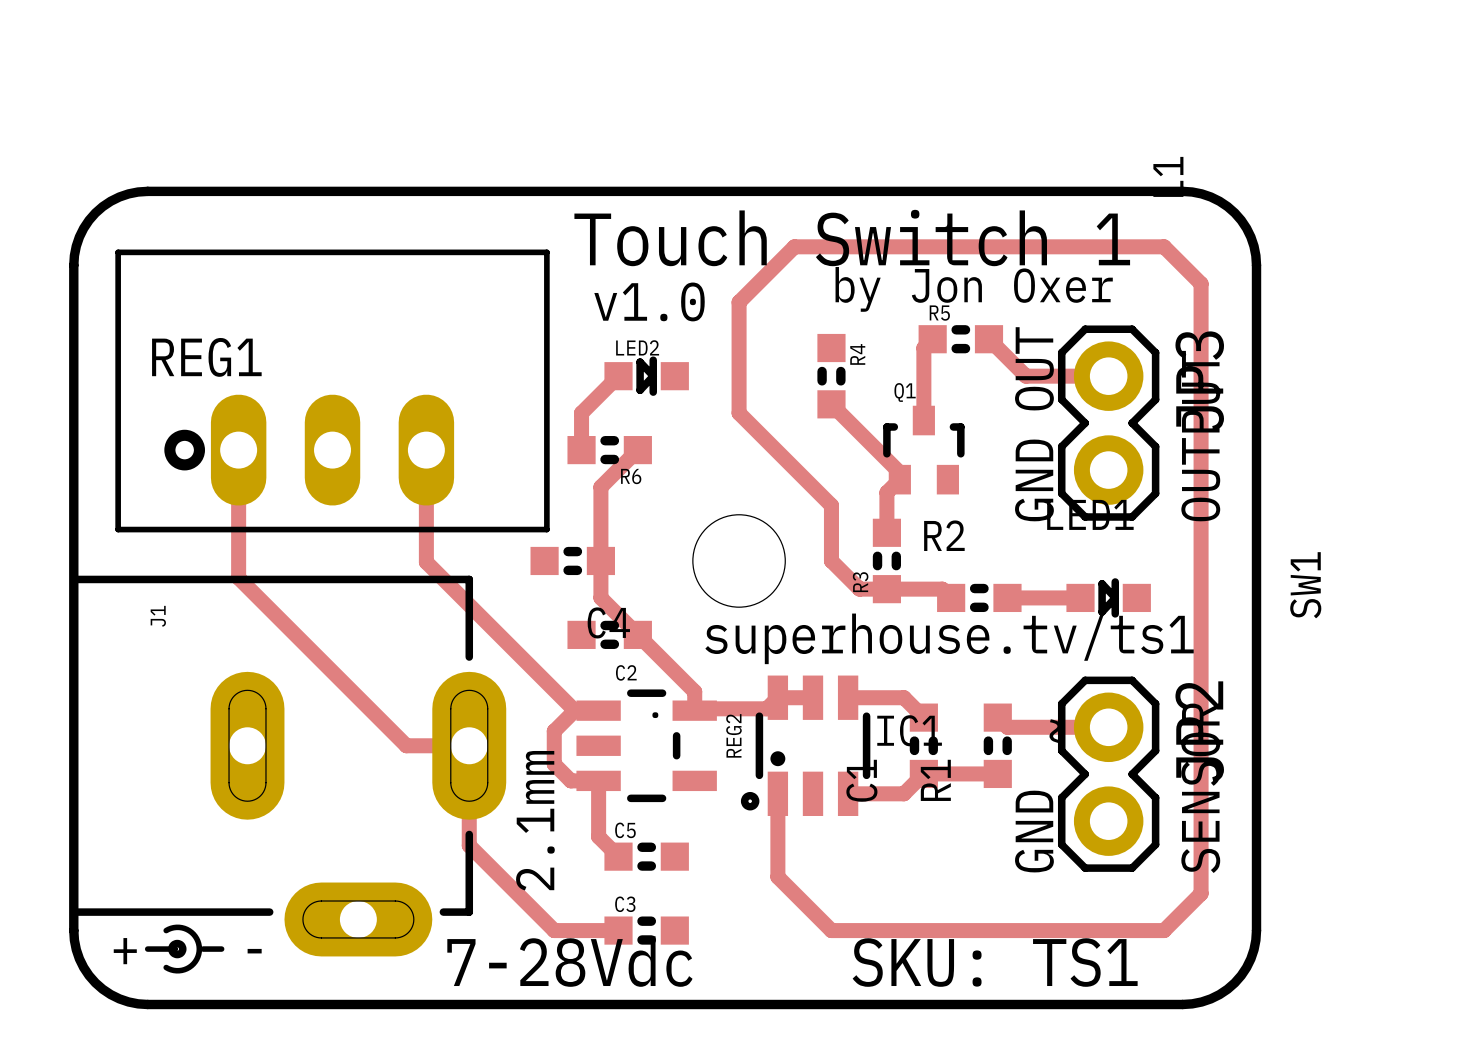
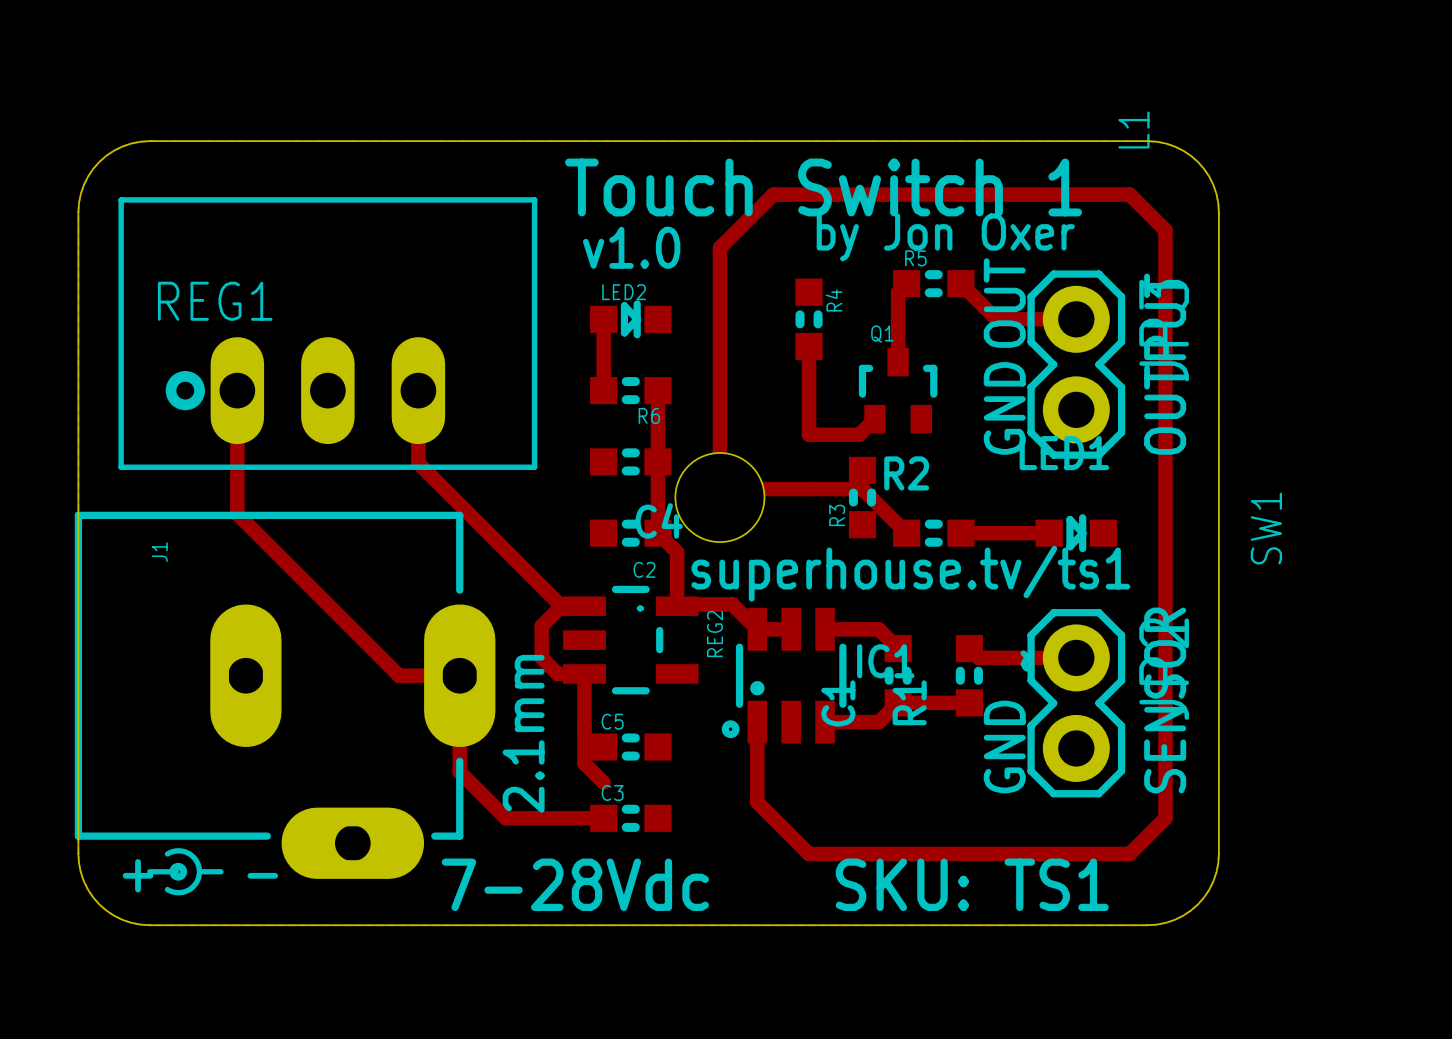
board edge width: thick (147, 191) (1182, 191) (1210, 197) (1227, 206) (1241, 220) (1250, 237) (1256, 265) (1256, 930) (1250, 958) (1241, 975) (1227, 989) (1210, 998) (1182, 1004) (147, 1004) (119, 998) (102, 989) (89, 975) (79, 958) (73, 930) (73, 265) (79, 237) (95, 213) (119, 197) (147, 191) -> thin (149, 141) (1147, 141) (1174, 146) (1191, 155) (1204, 169) (1213, 185) (1218, 212) (1218, 853) (1213, 881) (1204, 897) (1191, 910) (1174, 919) (1147, 925) (149, 925) (122, 919) (106, 910) (93, 897) (83, 881) (78, 853) (78, 212) (83, 185) (99, 162) (122, 146) (149, 141)
top track: (618, 376) (581, 413) (581, 450) -> (603, 319) (603, 390)
top track: (831, 404) (899, 472) (899, 479) -> (809, 346) (809, 434) (859, 434) (862, 431)
top track: (739, 413) (831, 505) (831, 560) (859, 589) (942, 589) (951, 597) -> (719, 354) (719, 461) (747, 489) (863, 489) (906, 533)
R6 position: (609, 450) -> (630, 390)
top track: (637, 450) (600, 487) (600, 597) (694, 691) (694, 710) (696, 708) (766, 708) (777, 697) -> (657, 390) (657, 533) (677, 552) (677, 606) (678, 604) (732, 604) (757, 629)
top track: (886, 492) (886, 532) -> none
top track: (426, 525) (426, 562) (574, 710) -> (418, 463) (561, 606)
C4 position: (572, 560) -> (630, 461)
R2 position: (979, 597) -> (933, 533)
C2 position: (609, 634) -> (630, 533)
top track: (574, 710) (554, 731) (554, 764) (570, 780) (598, 780) -> (561, 606) (541, 626) (541, 657) (557, 673) (584, 673) (584, 709)
REG2 position: (646, 745) -> (630, 640)
C5 position: (646, 856) -> (630, 747)
top track: (517, 893) (554, 930) (618, 930) -> (506, 818) (603, 818)
C3 position: (646, 930) -> (630, 818)

